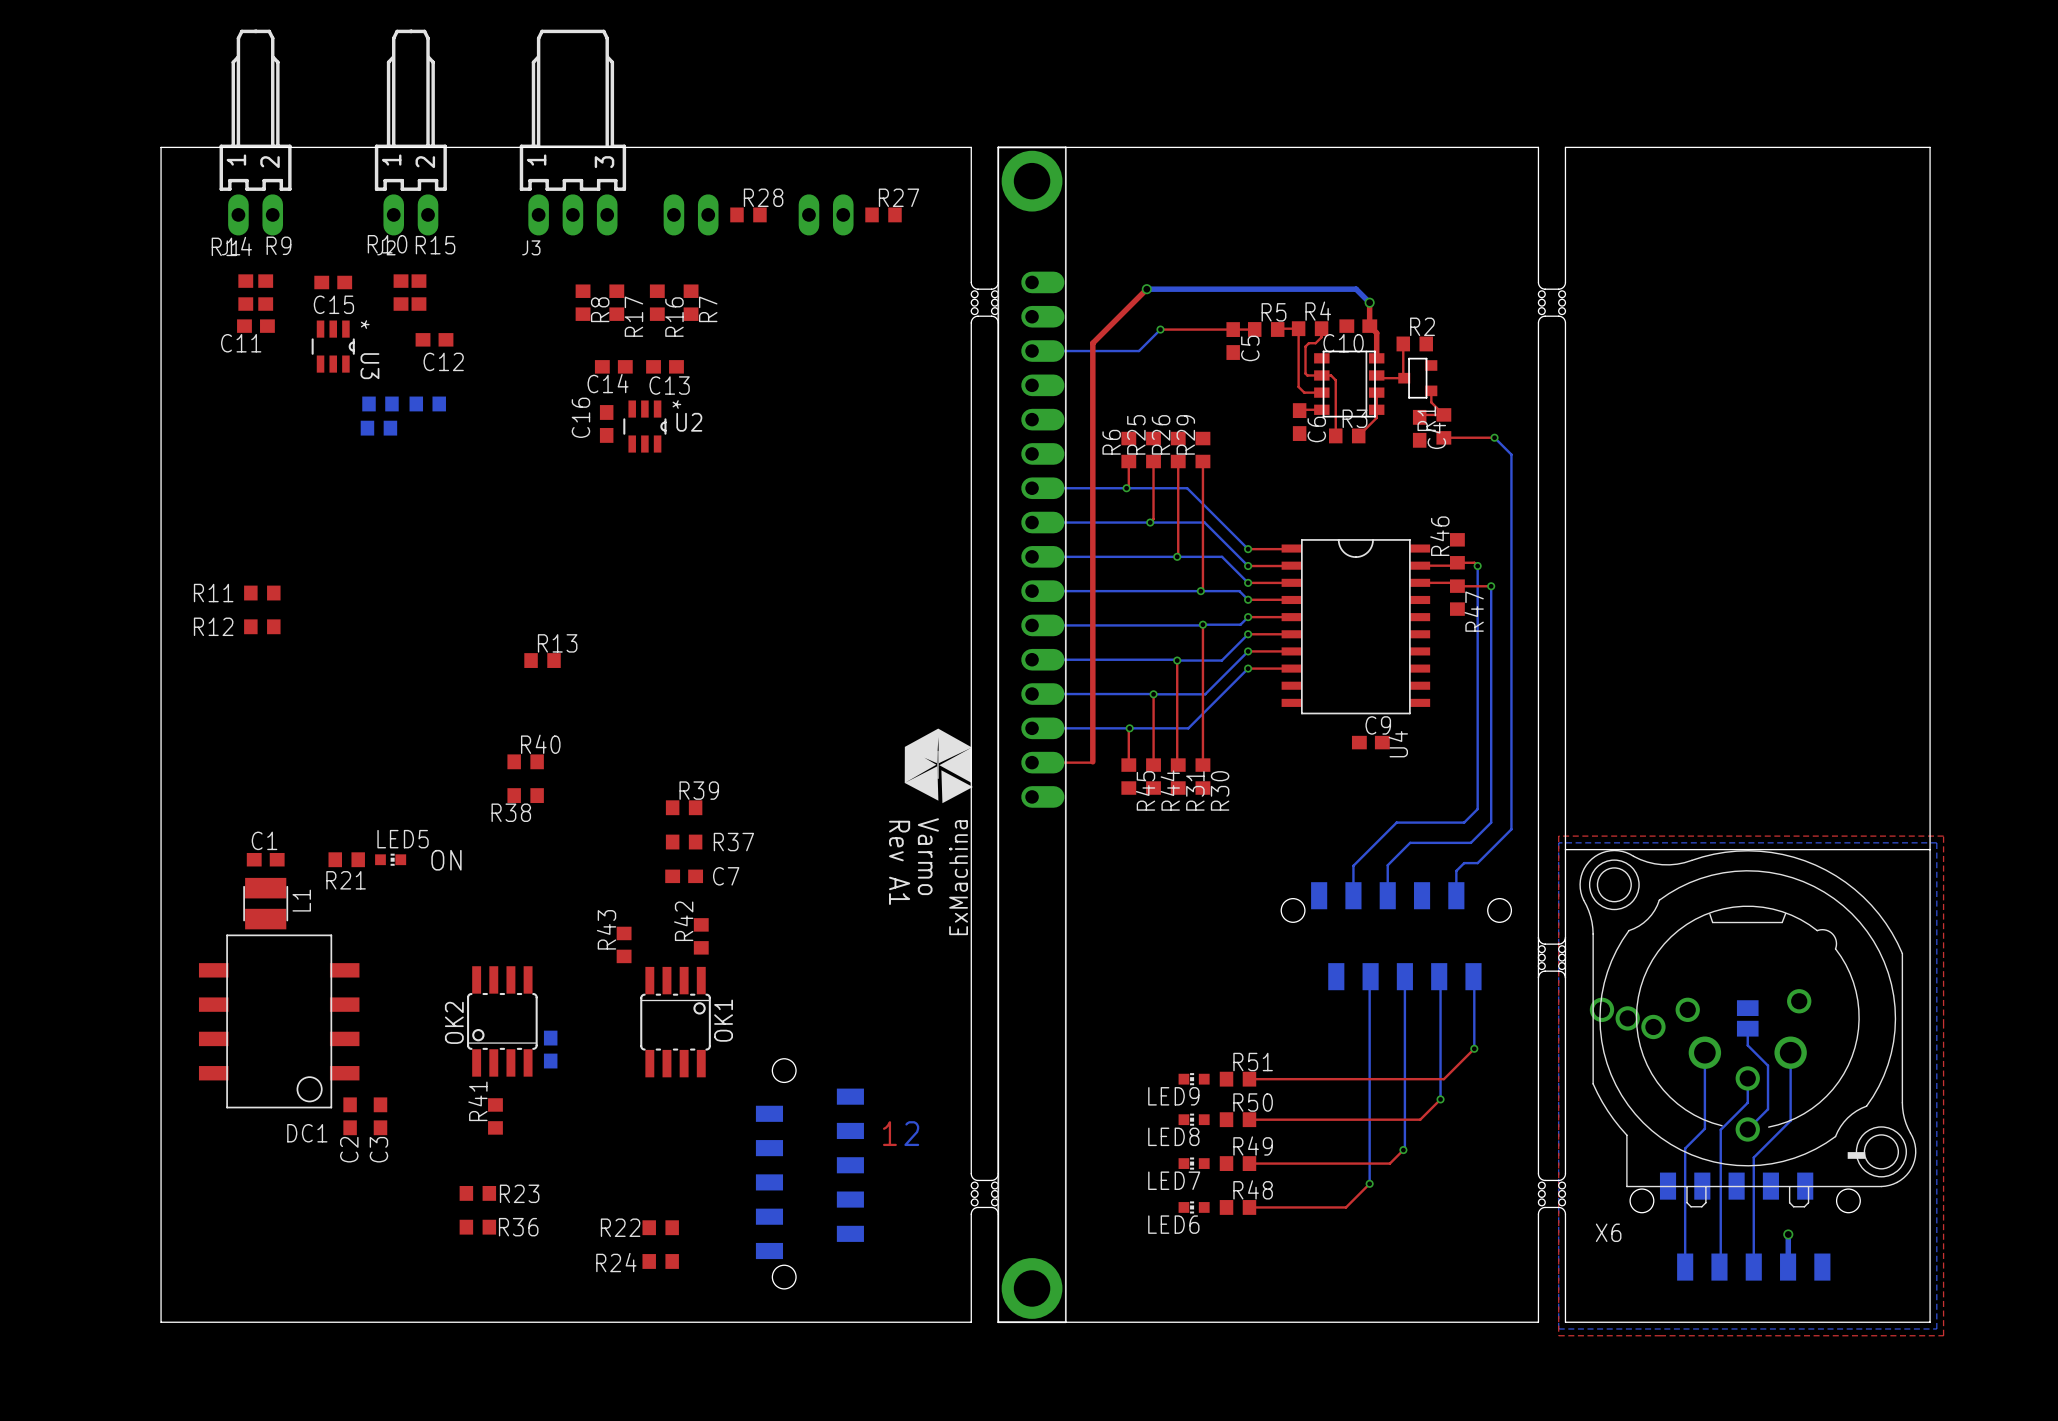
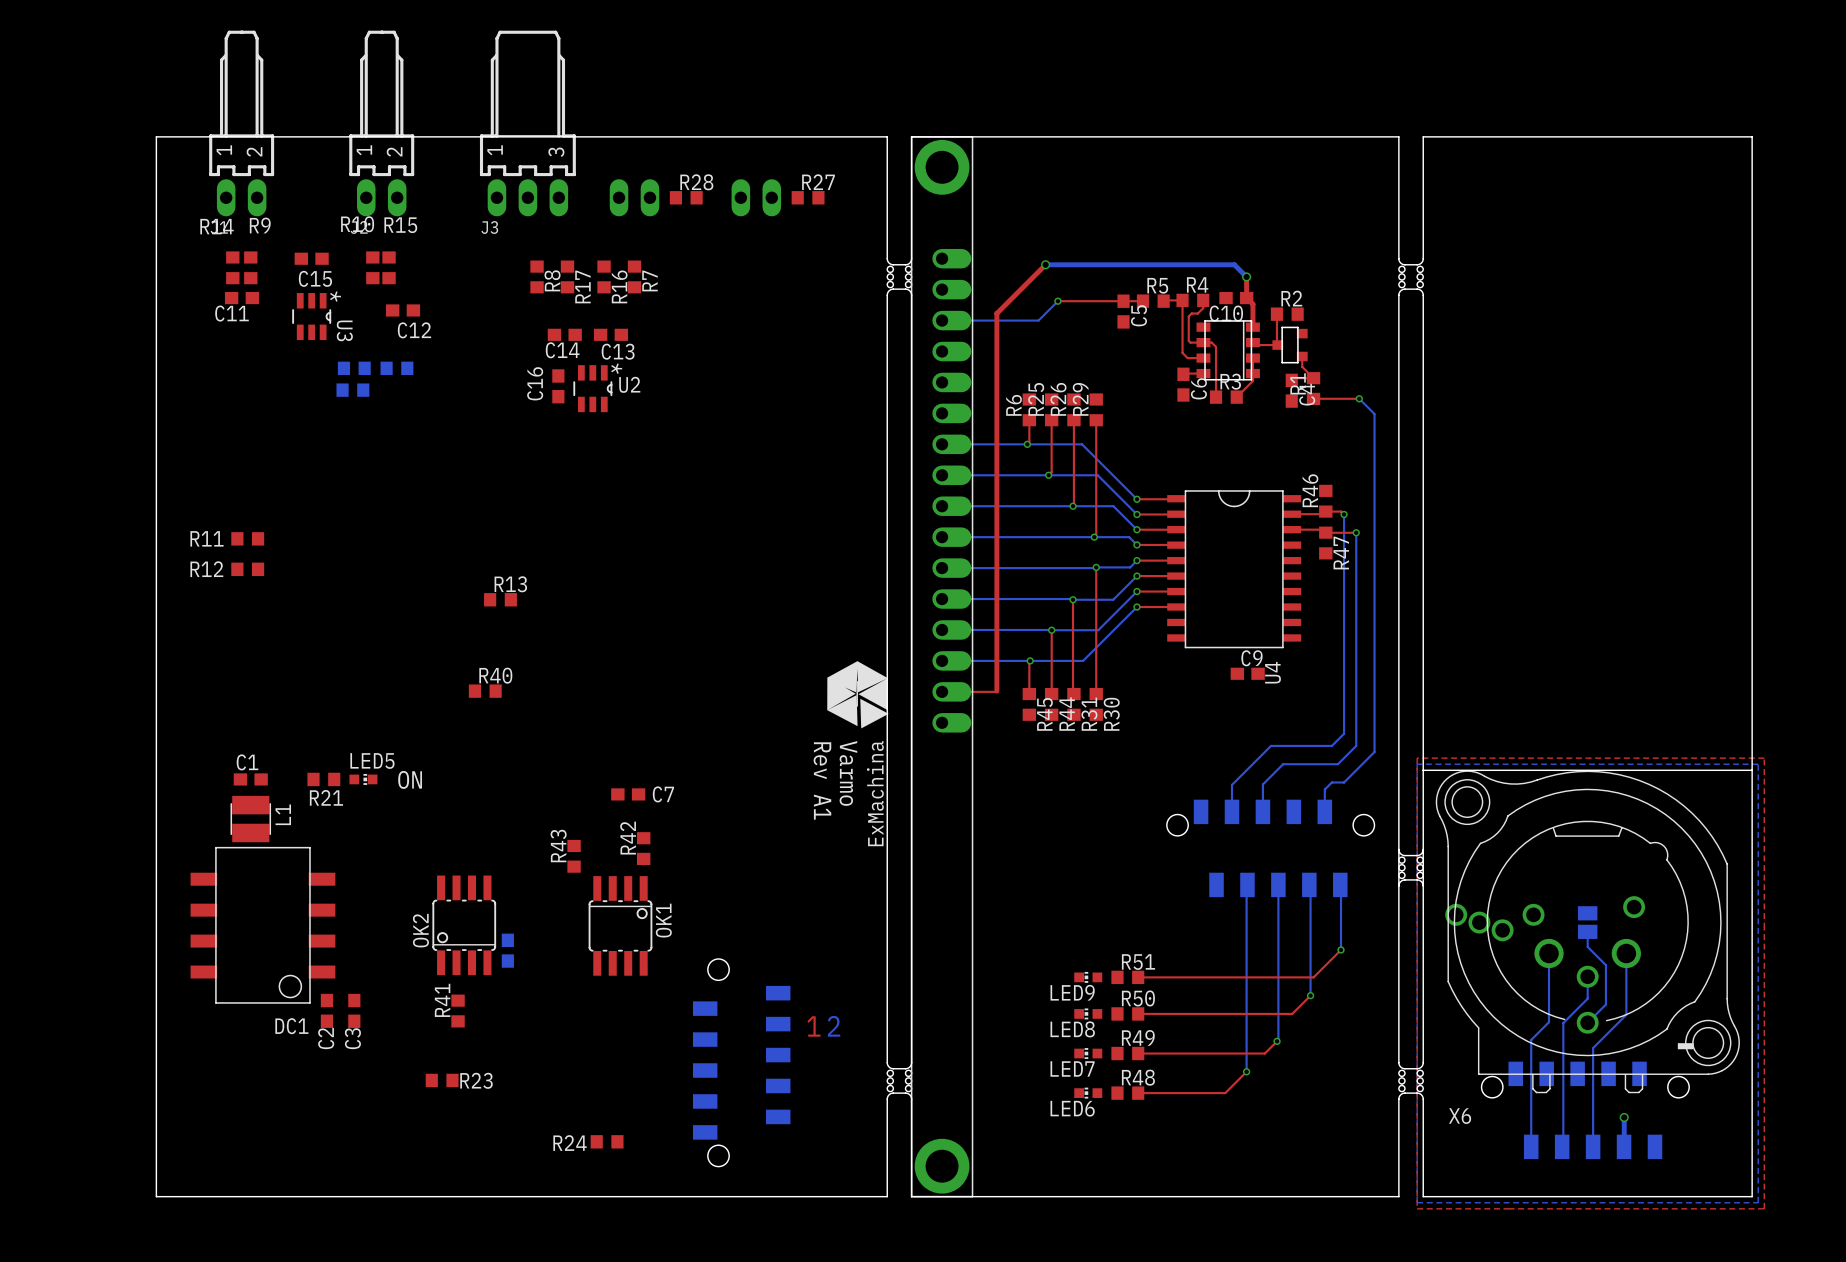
R38: (525, 795) -> none
R39: (684, 807) -> none
R37: (684, 842) -> none
R36: (477, 1227) -> none
R22: (660, 1227) -> none

